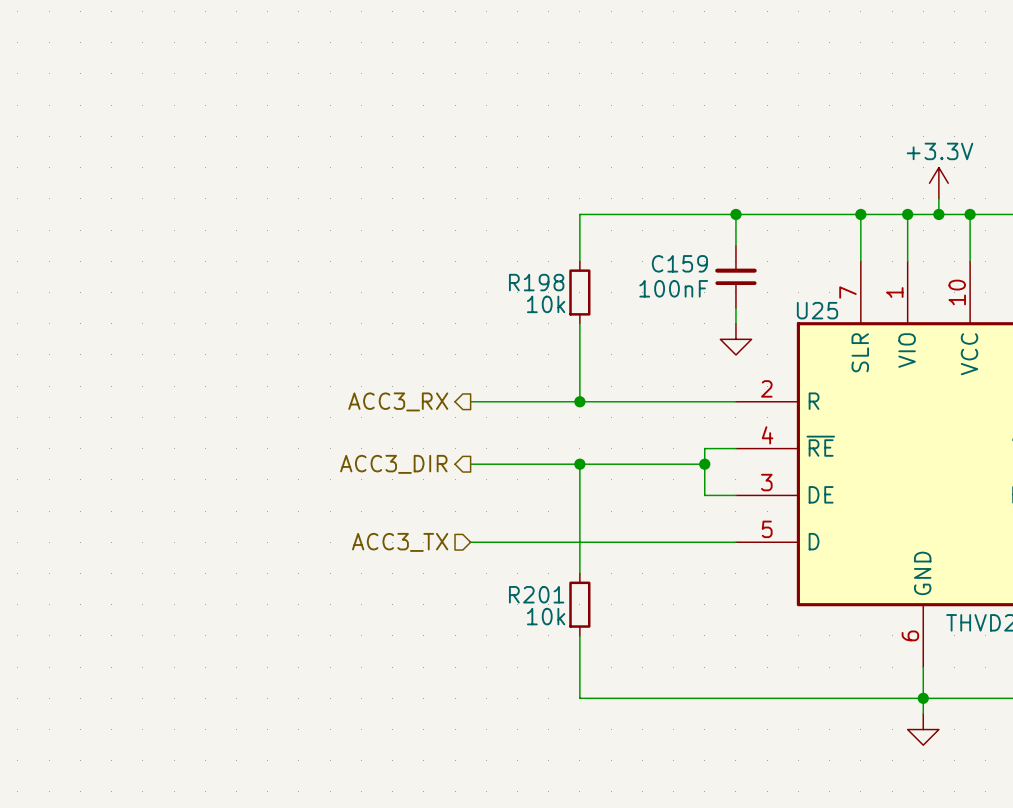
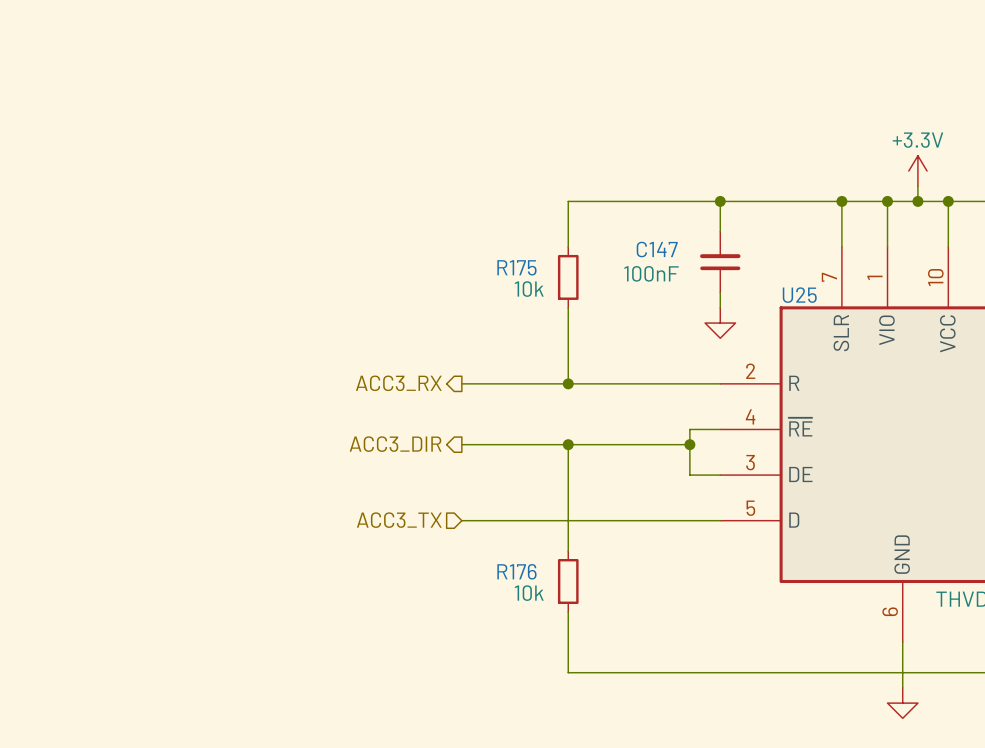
C159 name: C159 (679, 263) -> C147 (657, 249)
R198 name: R198 (536, 282) -> R175 (516, 267)
R201 name: R201 (536, 594) -> R176 (516, 571)
junction: (923, 698) -> none

